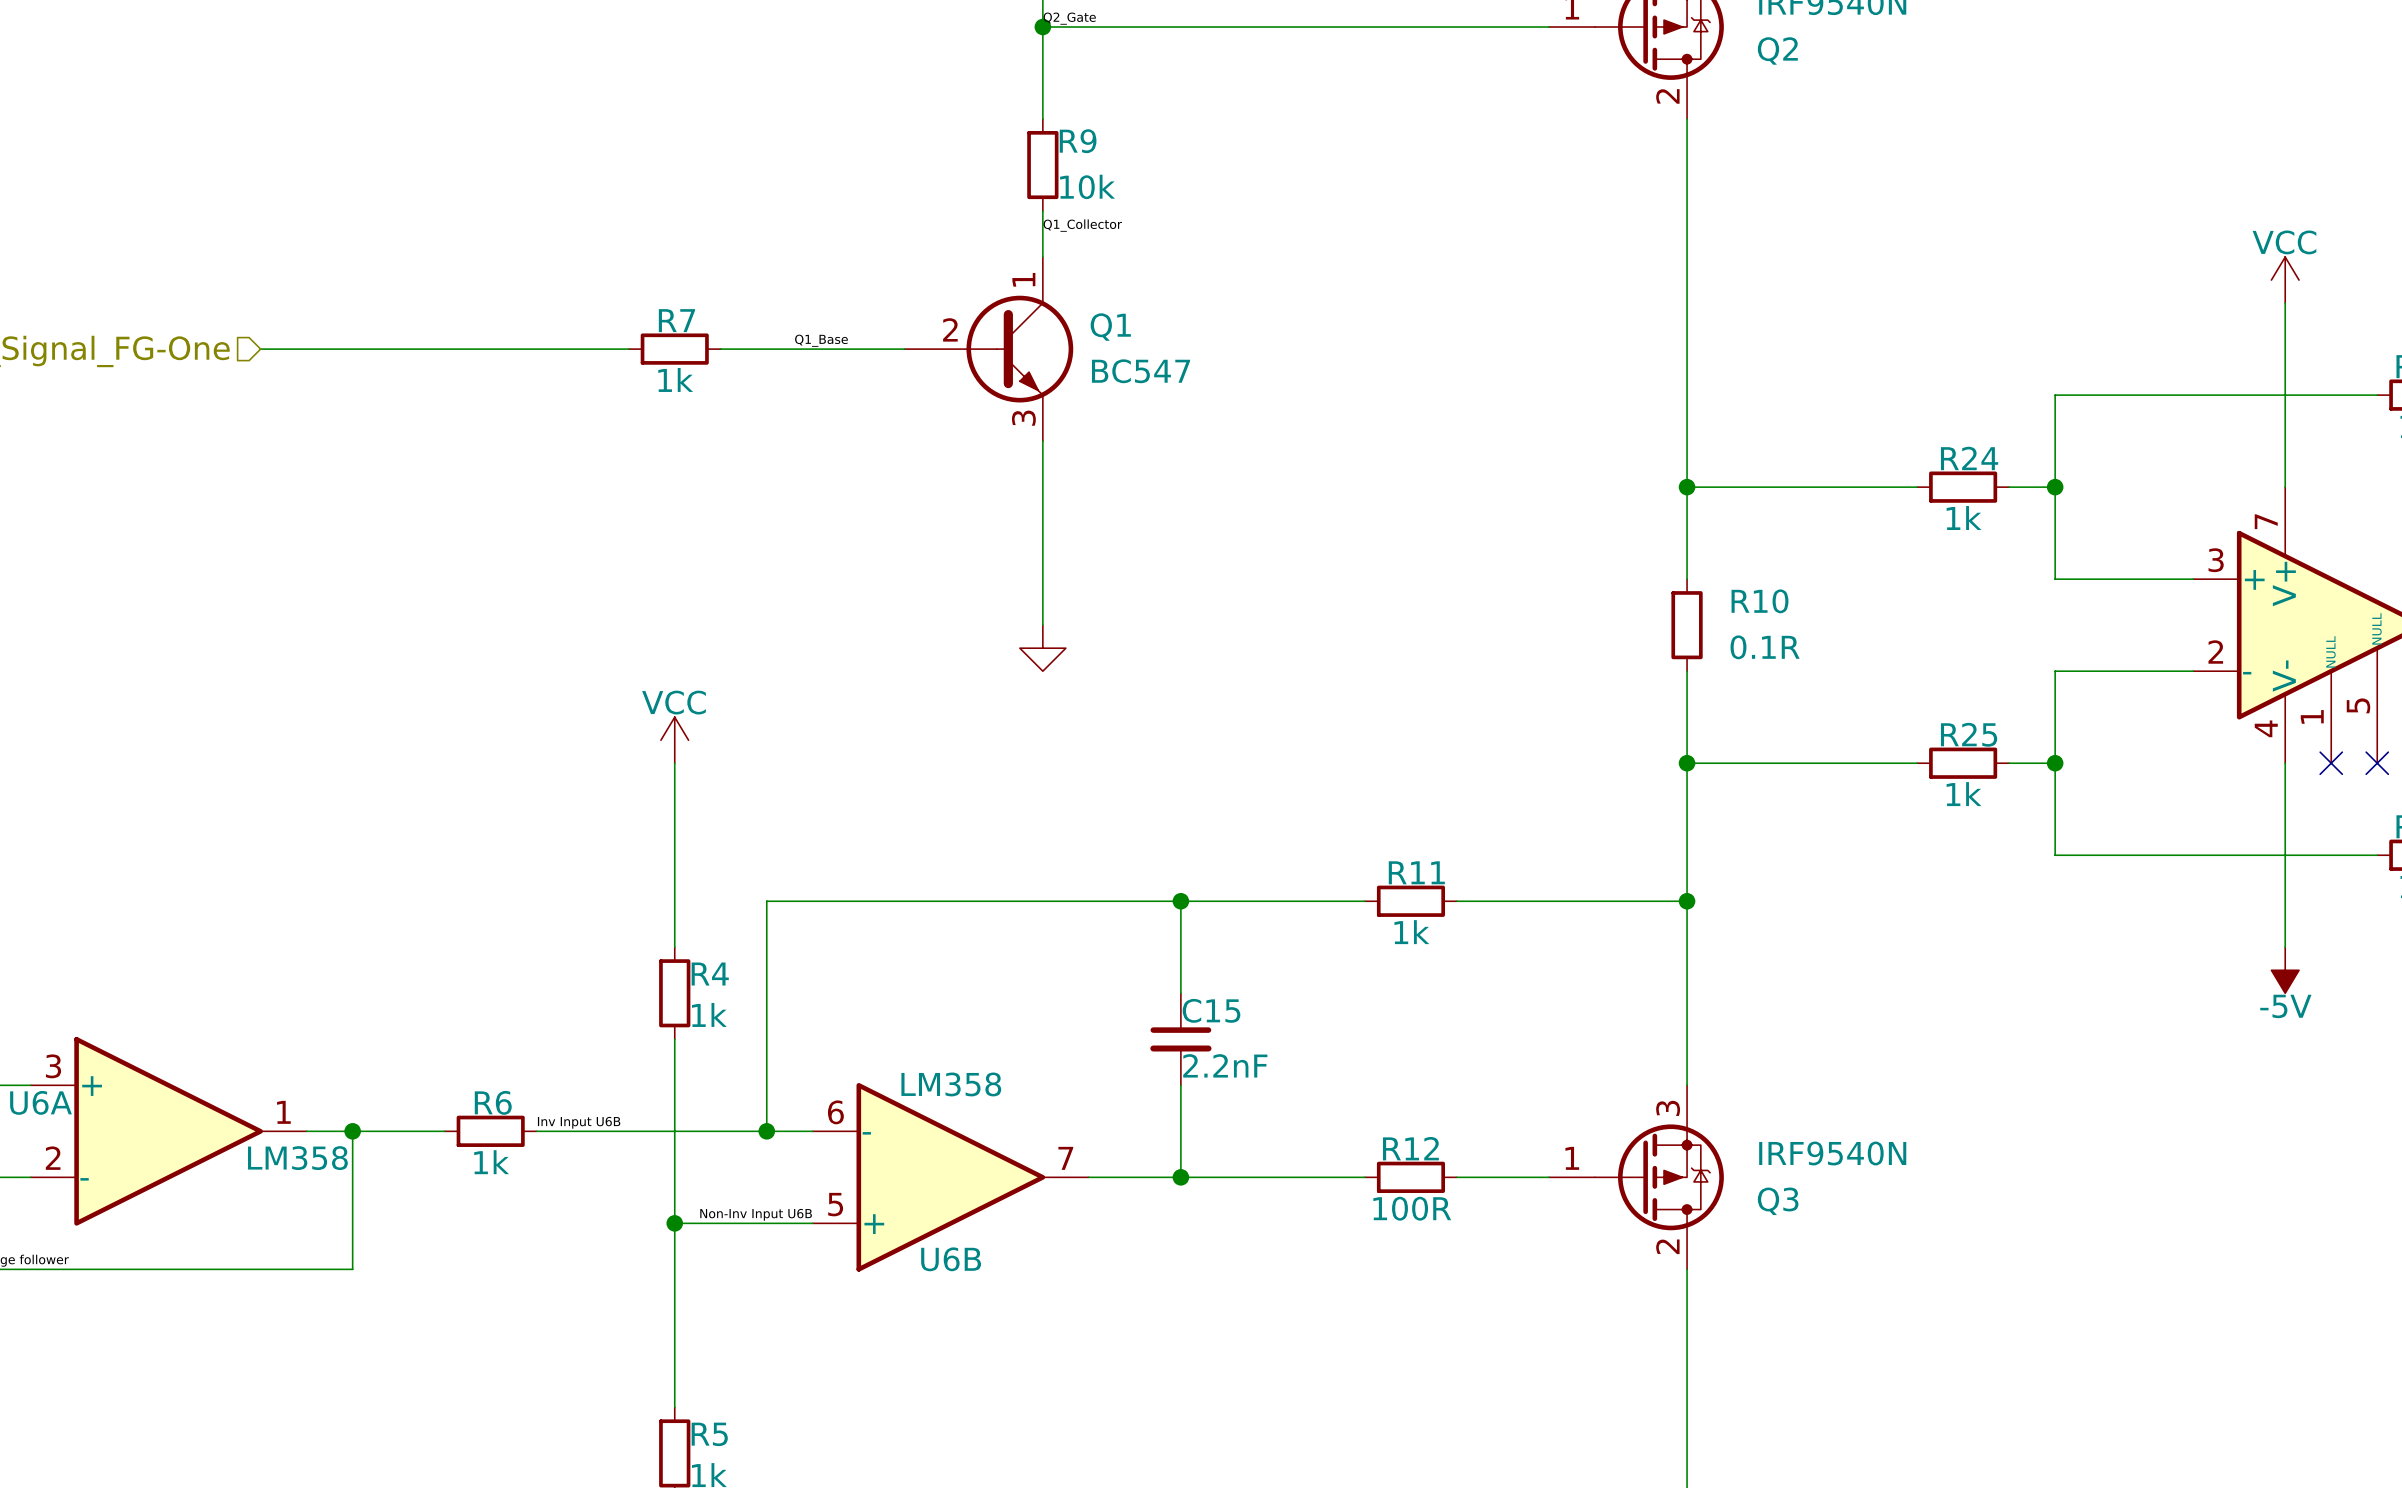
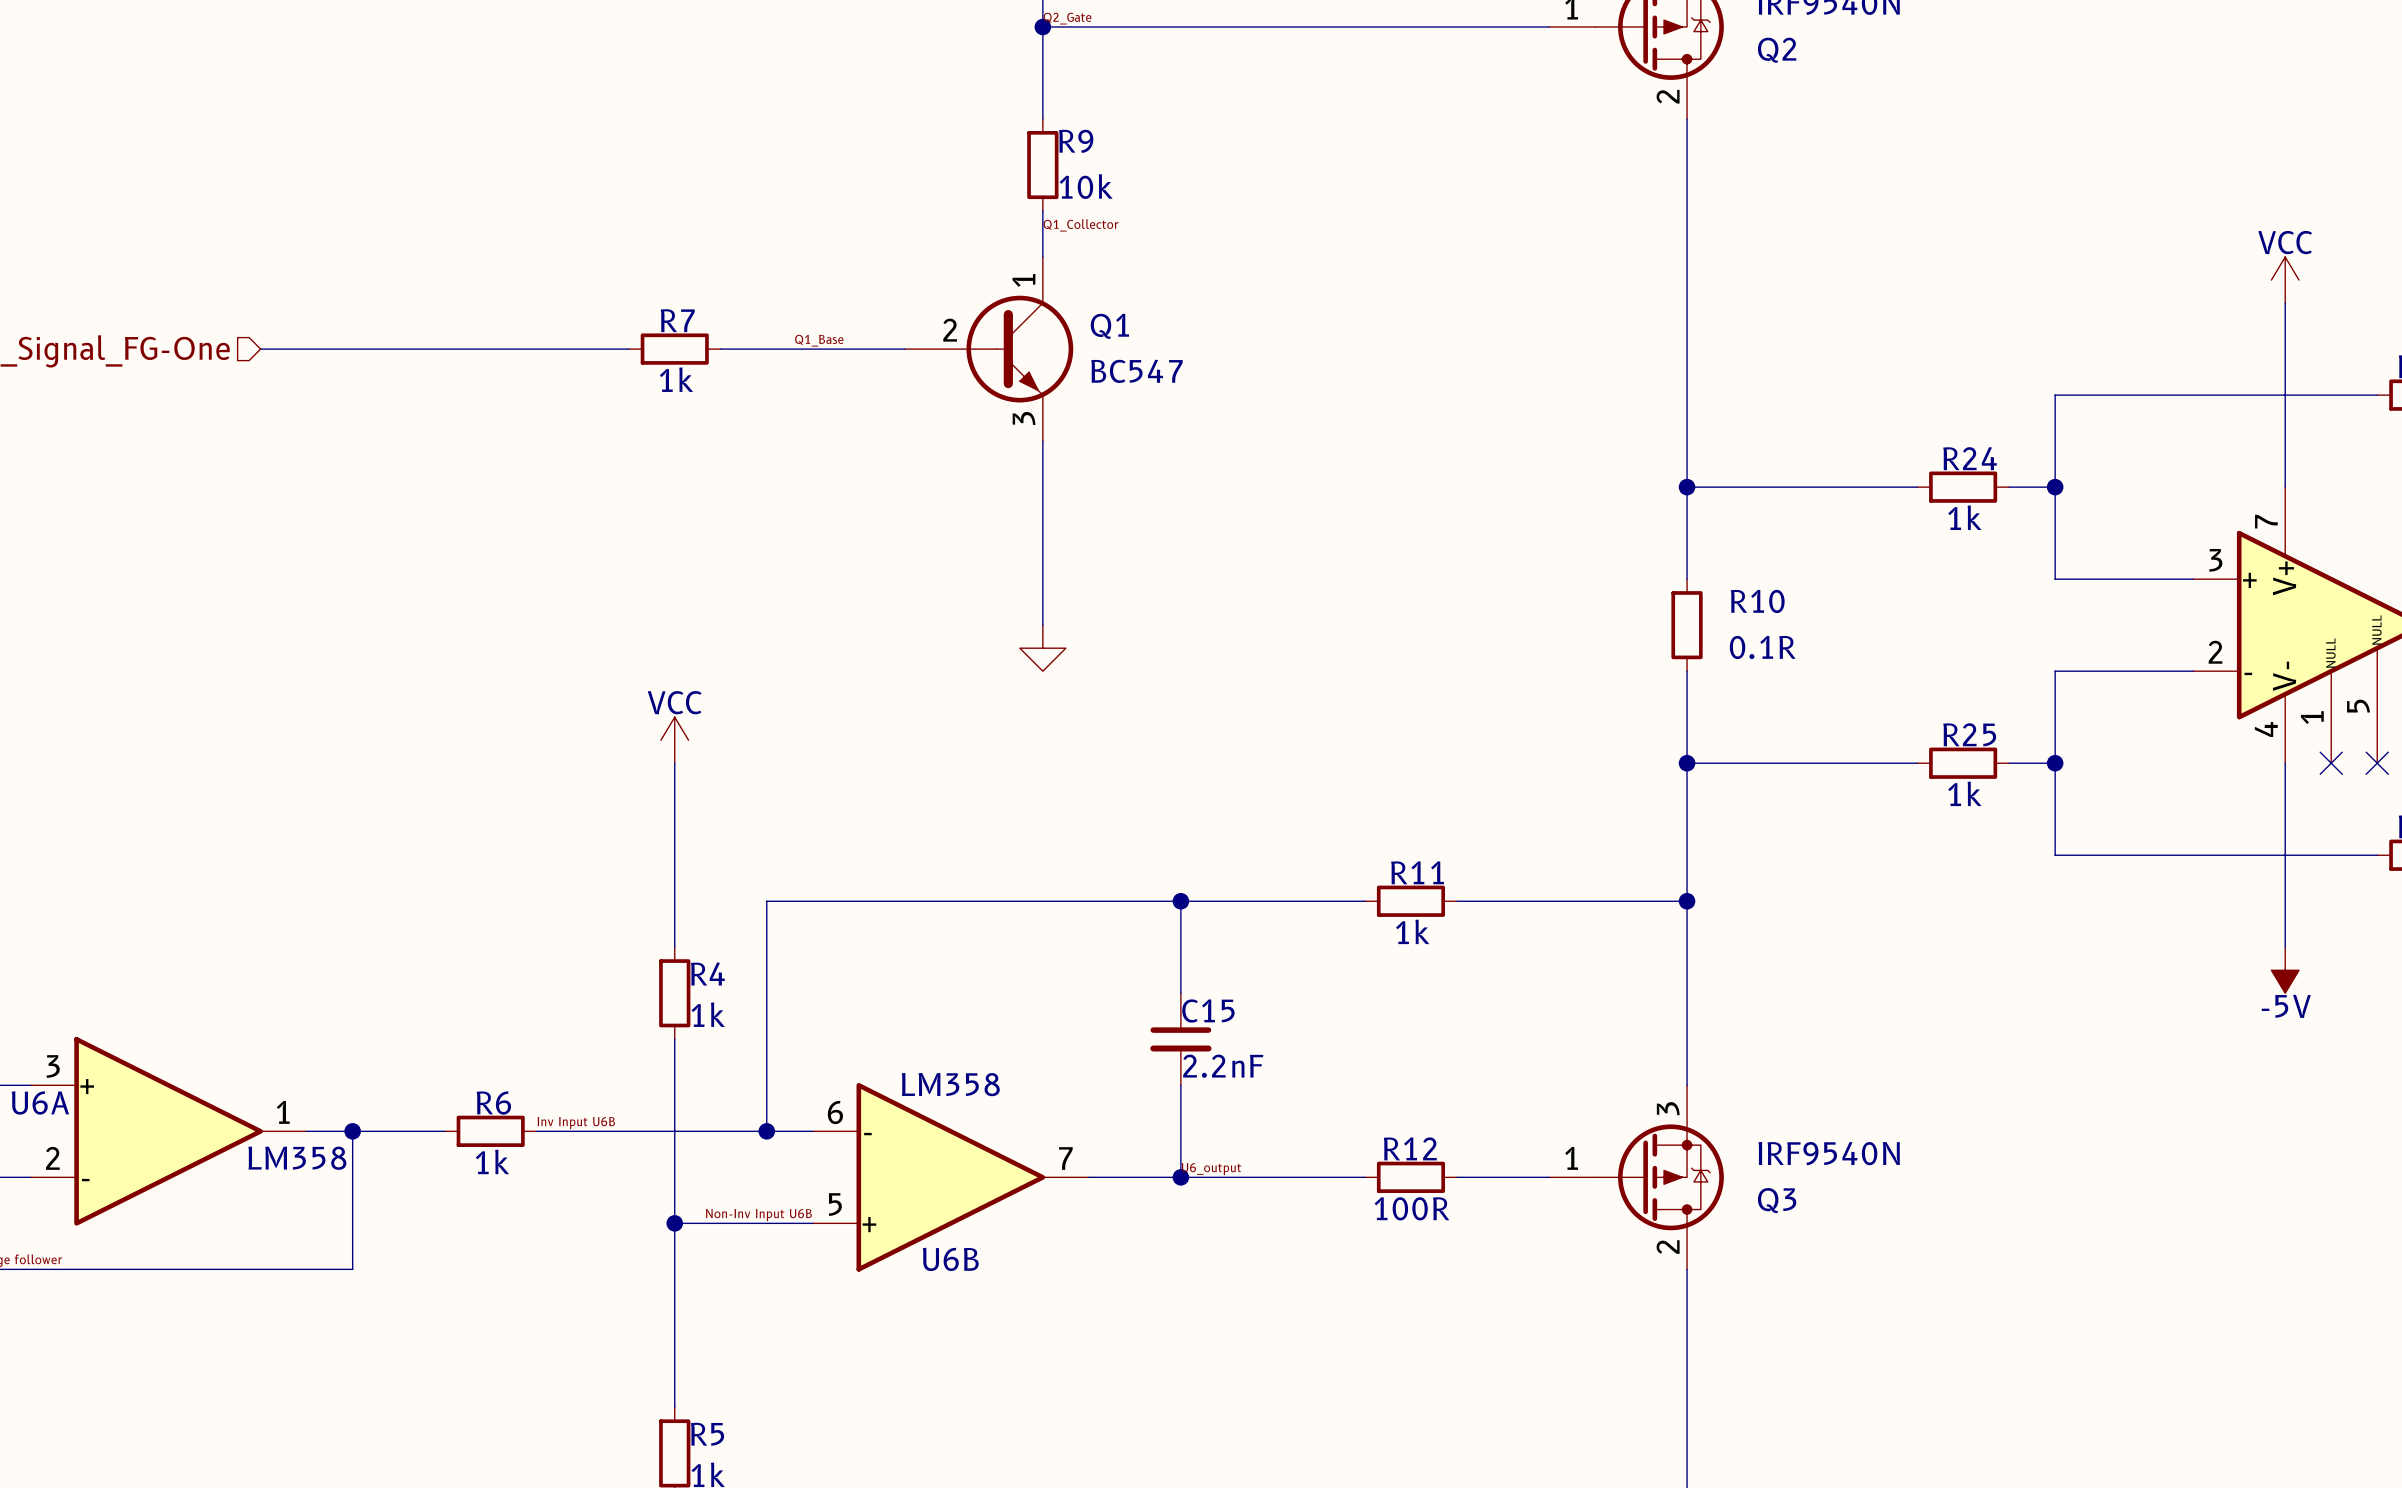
label: none -> U6_output (1211, 1169)

